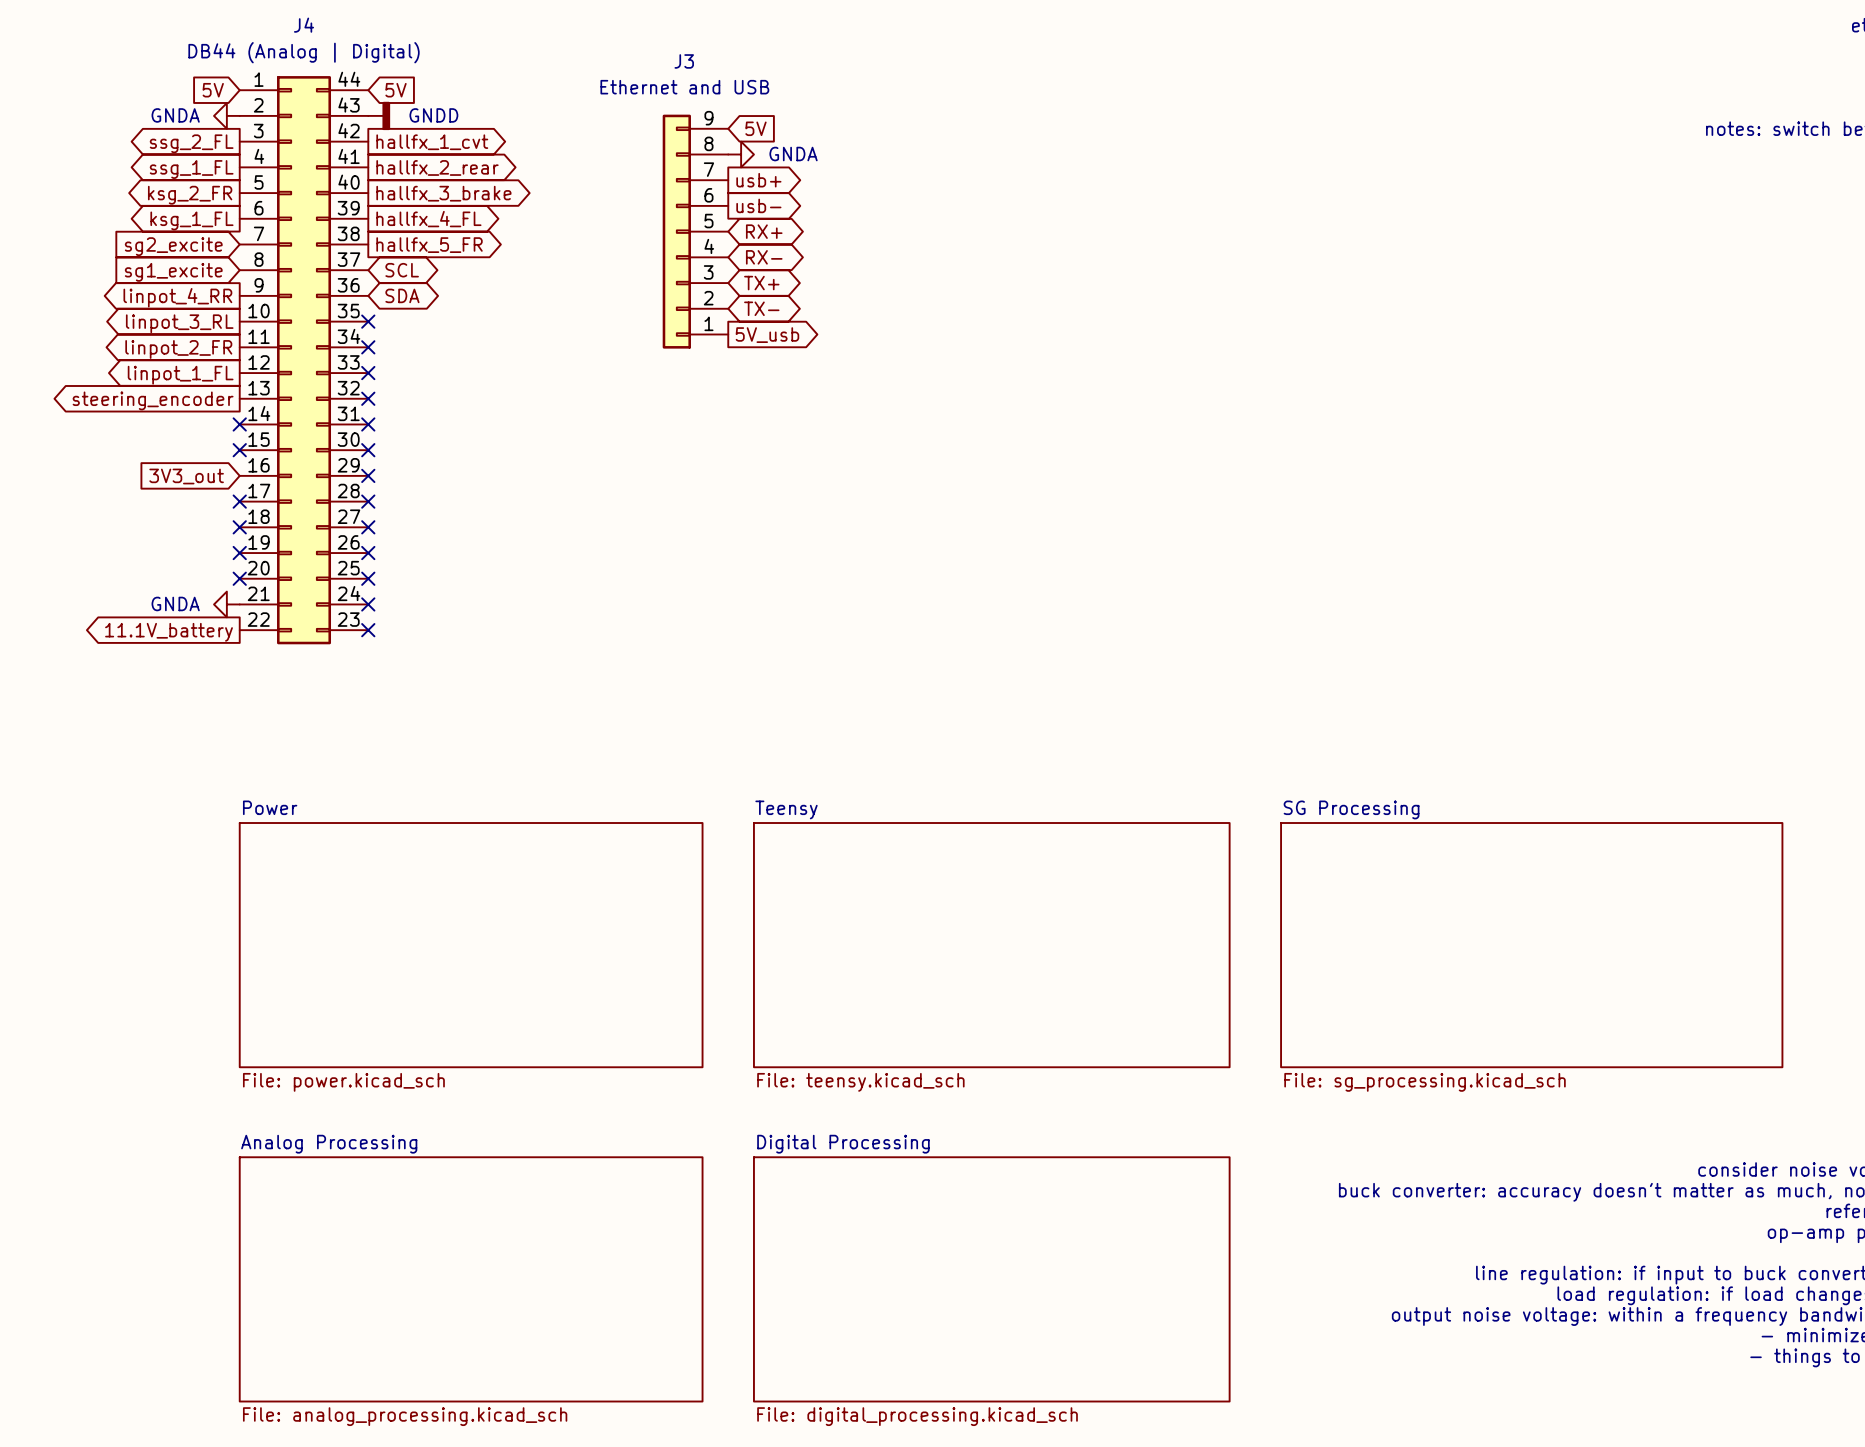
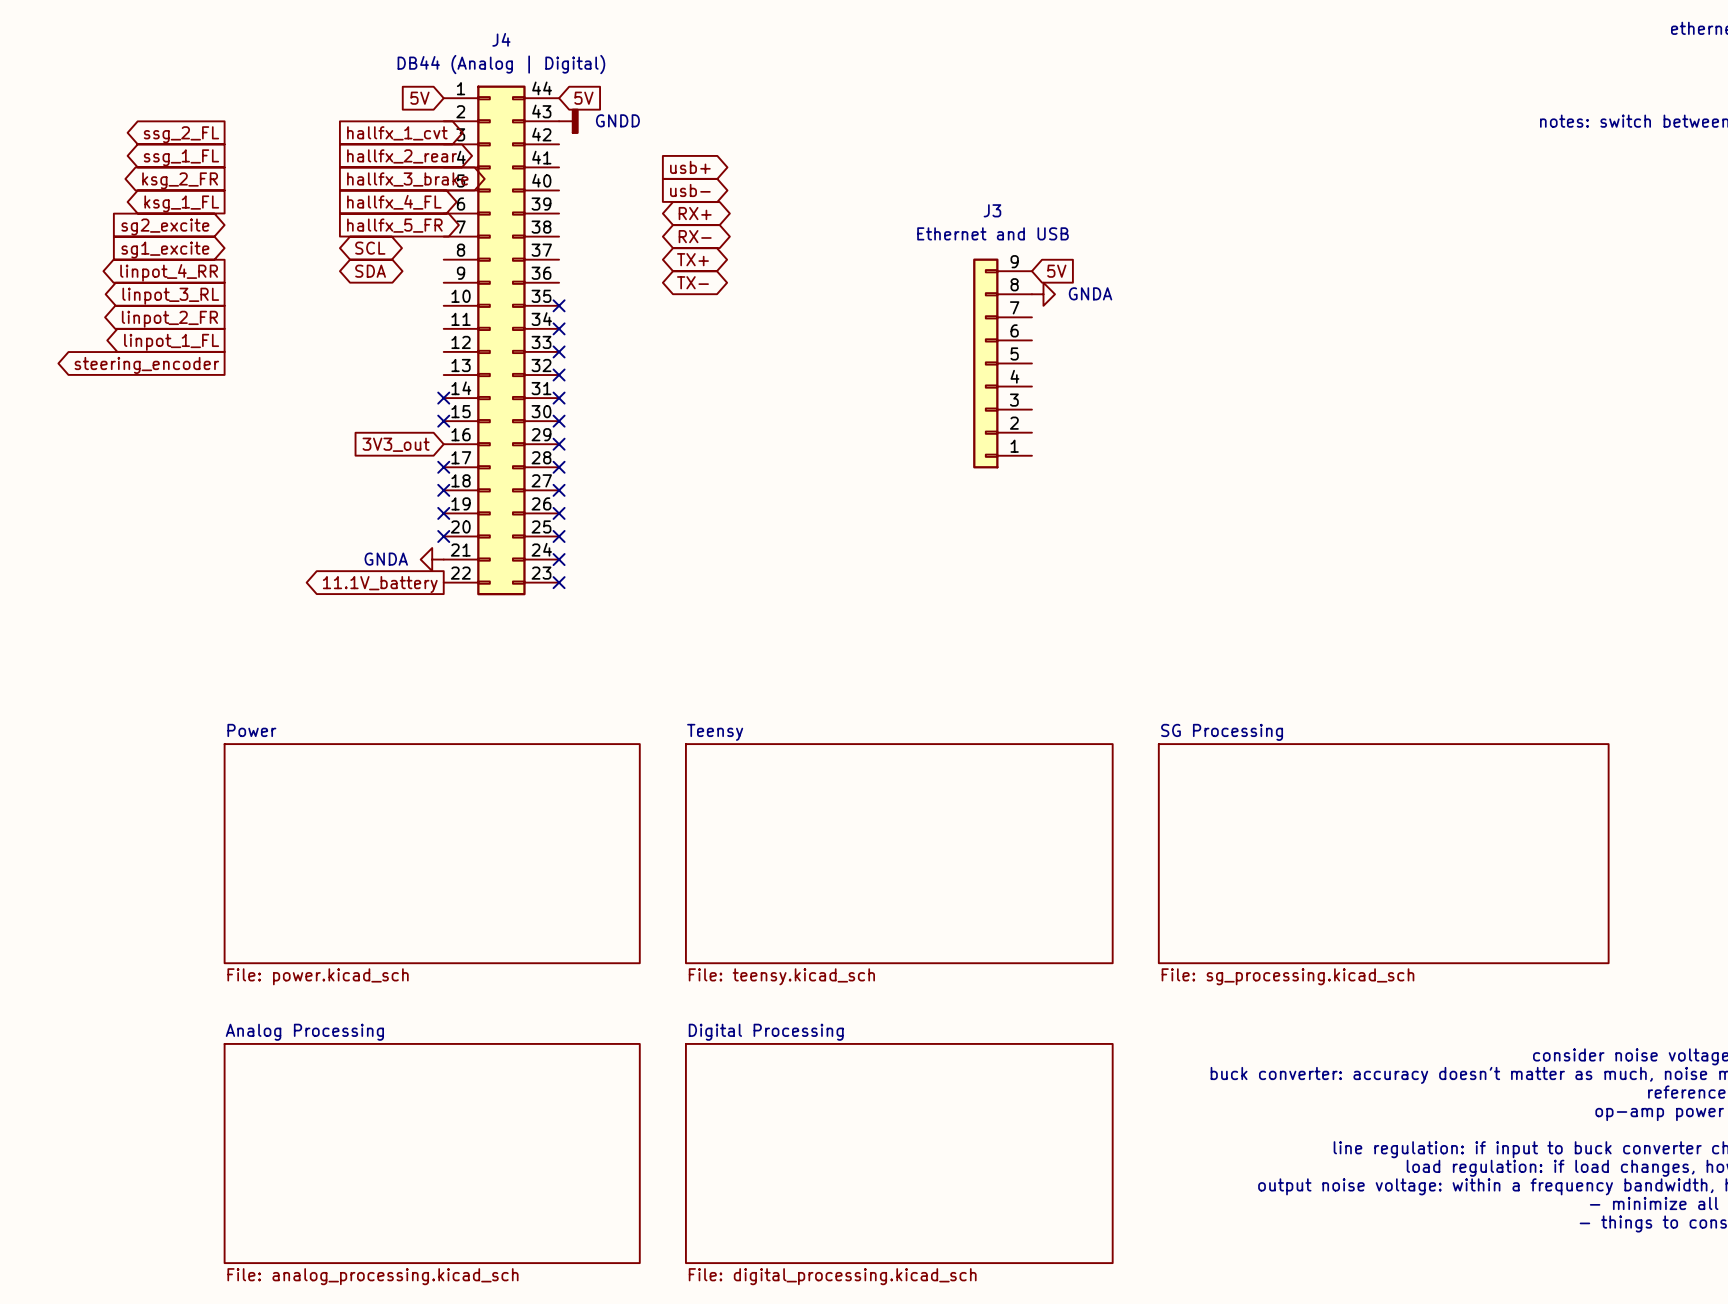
global label: 5V (213, 90) -> none
global label rotation: 0° (396, 90) -> 180° (419, 98)
power symbol: GNDA (226, 115) -> none
power symbol position: GNDD (379, 115) -> GNDD (568, 121)
global label position: 5V (755, 128) -> 5V (583, 98)
power symbol: GNDA (741, 154) -> none
J3 position: (695, 231) -> (1002, 363)
global label: none -> 5V (1056, 271)
no-connect mark: (368, 321) -> none
power symbol: none -> GNDA (1043, 294)
no-connect mark: none -> (559, 305)
global label: 5V_usb (767, 335) -> none
no-connect mark: (368, 347) -> none
J4 position: (304, 360) -> (501, 340)
no-connect mark: none -> (559, 328)
no-connect mark: (368, 373) -> none
no-connect mark: none -> (559, 351)
no-connect mark: (368, 398) -> none
no-connect mark: none -> (559, 375)
no-connect mark: (239, 424) -> none
no-connect mark: (368, 424) -> none
no-connect mark: none -> (443, 398)
no-connect mark: none -> (559, 398)
no-connect mark: (239, 450) -> none
no-connect mark: (368, 450) -> none
no-connect mark: none -> (443, 421)
no-connect mark: none -> (559, 421)
no-connect mark: (368, 475) -> none
global label position: 3V3_out (186, 476) -> 3V3_out (396, 444)
no-connect mark: none -> (559, 444)
no-connect mark: (239, 501) -> none
no-connect mark: (368, 501) -> none
no-connect mark: none -> (443, 467)
no-connect mark: none -> (559, 467)
no-connect mark: (239, 527) -> none
no-connect mark: (368, 527) -> none
no-connect mark: none -> (443, 490)
no-connect mark: none -> (559, 490)
no-connect mark: (239, 553) -> none
no-connect mark: (368, 553) -> none
no-connect mark: none -> (443, 513)
no-connect mark: none -> (559, 513)
no-connect mark: (239, 578) -> none
no-connect mark: (368, 578) -> none
no-connect mark: none -> (443, 536)
no-connect mark: none -> (559, 536)
power symbol position: GNDA (226, 604) -> GNDA (432, 559)
no-connect mark: (368, 604) -> none
no-connect mark: none -> (559, 559)
no-connect mark: (368, 630) -> none
global label position: 11.1V_battery (169, 632) -> 11.1V_battery (380, 584)
no-connect mark: none -> (559, 582)

